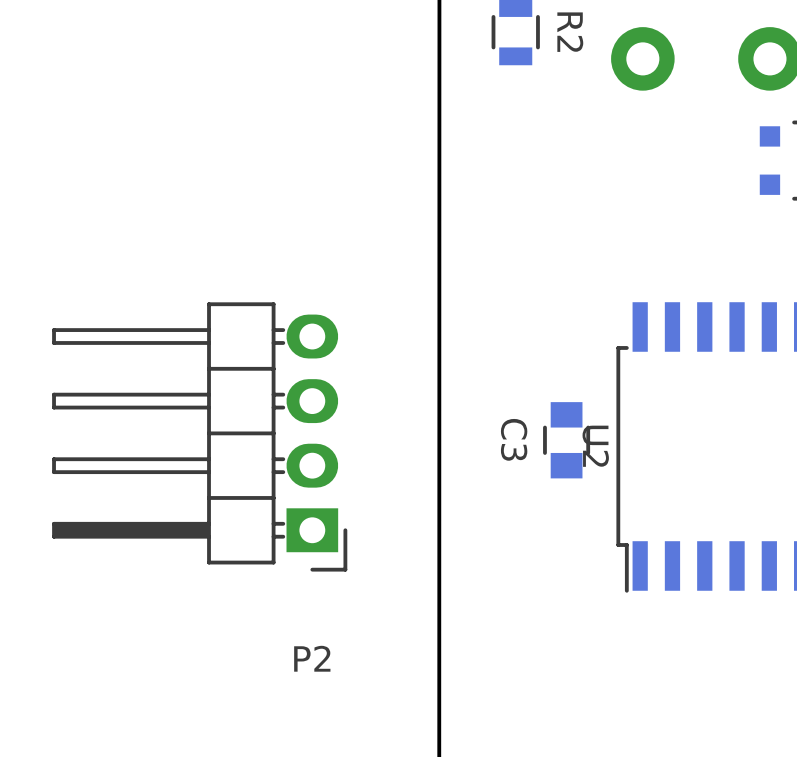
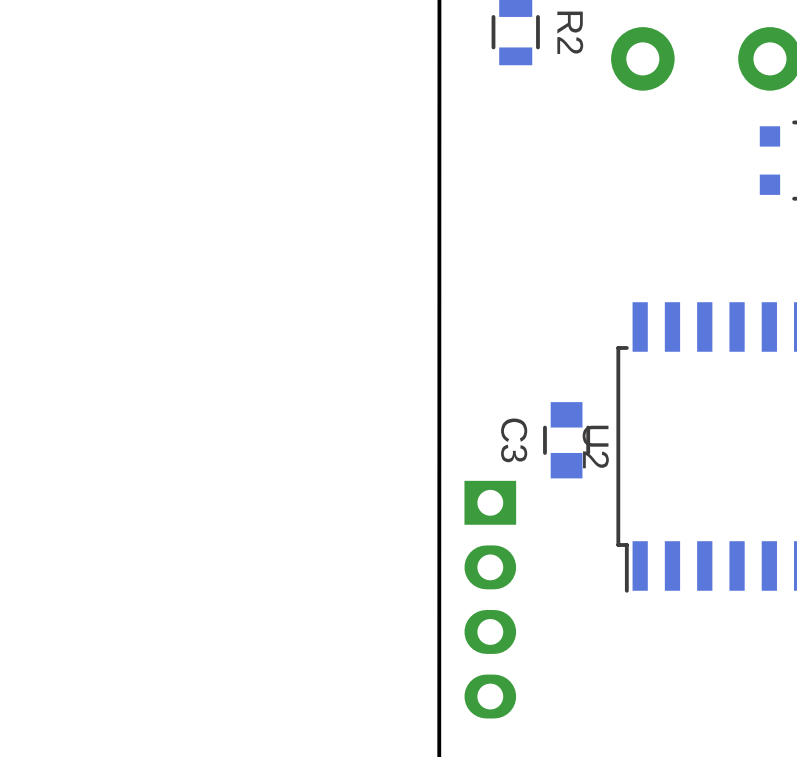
P2 side: bottom (199, 436) -> top (490, 599)

